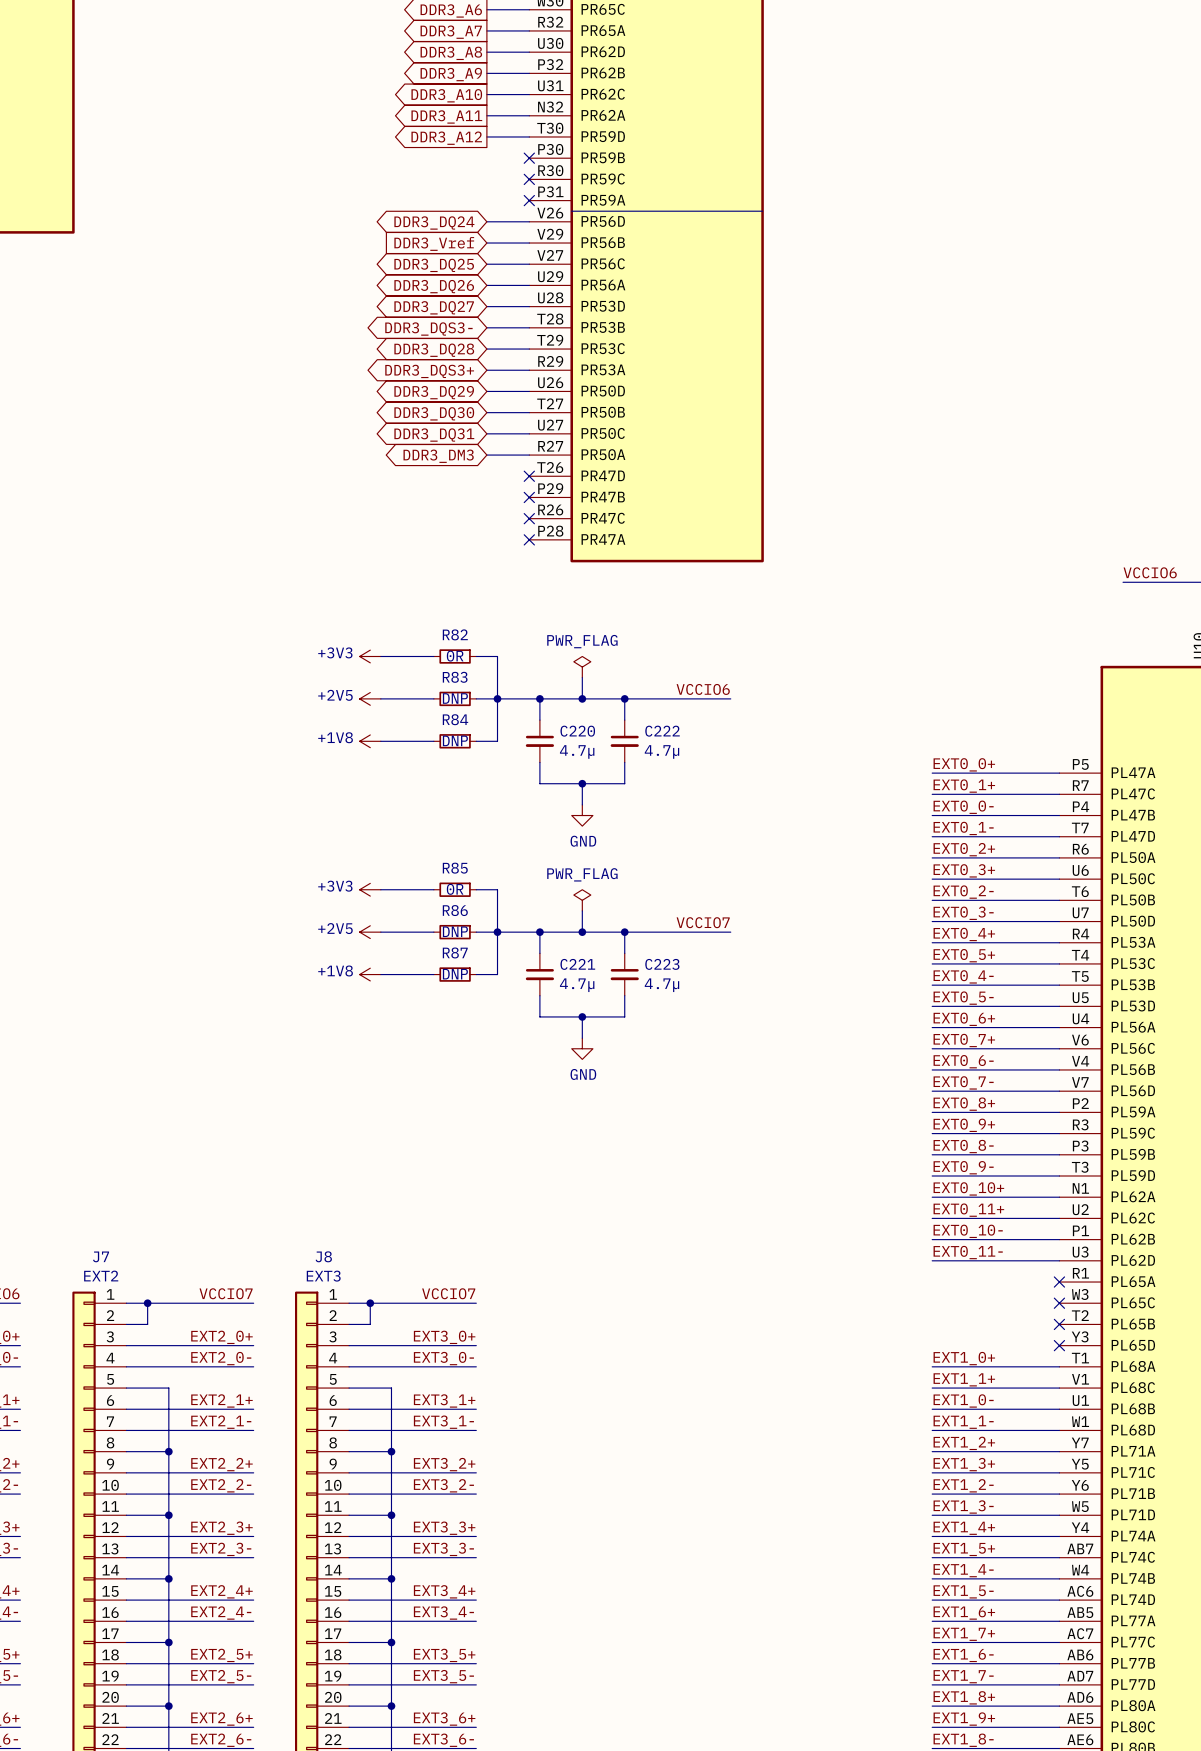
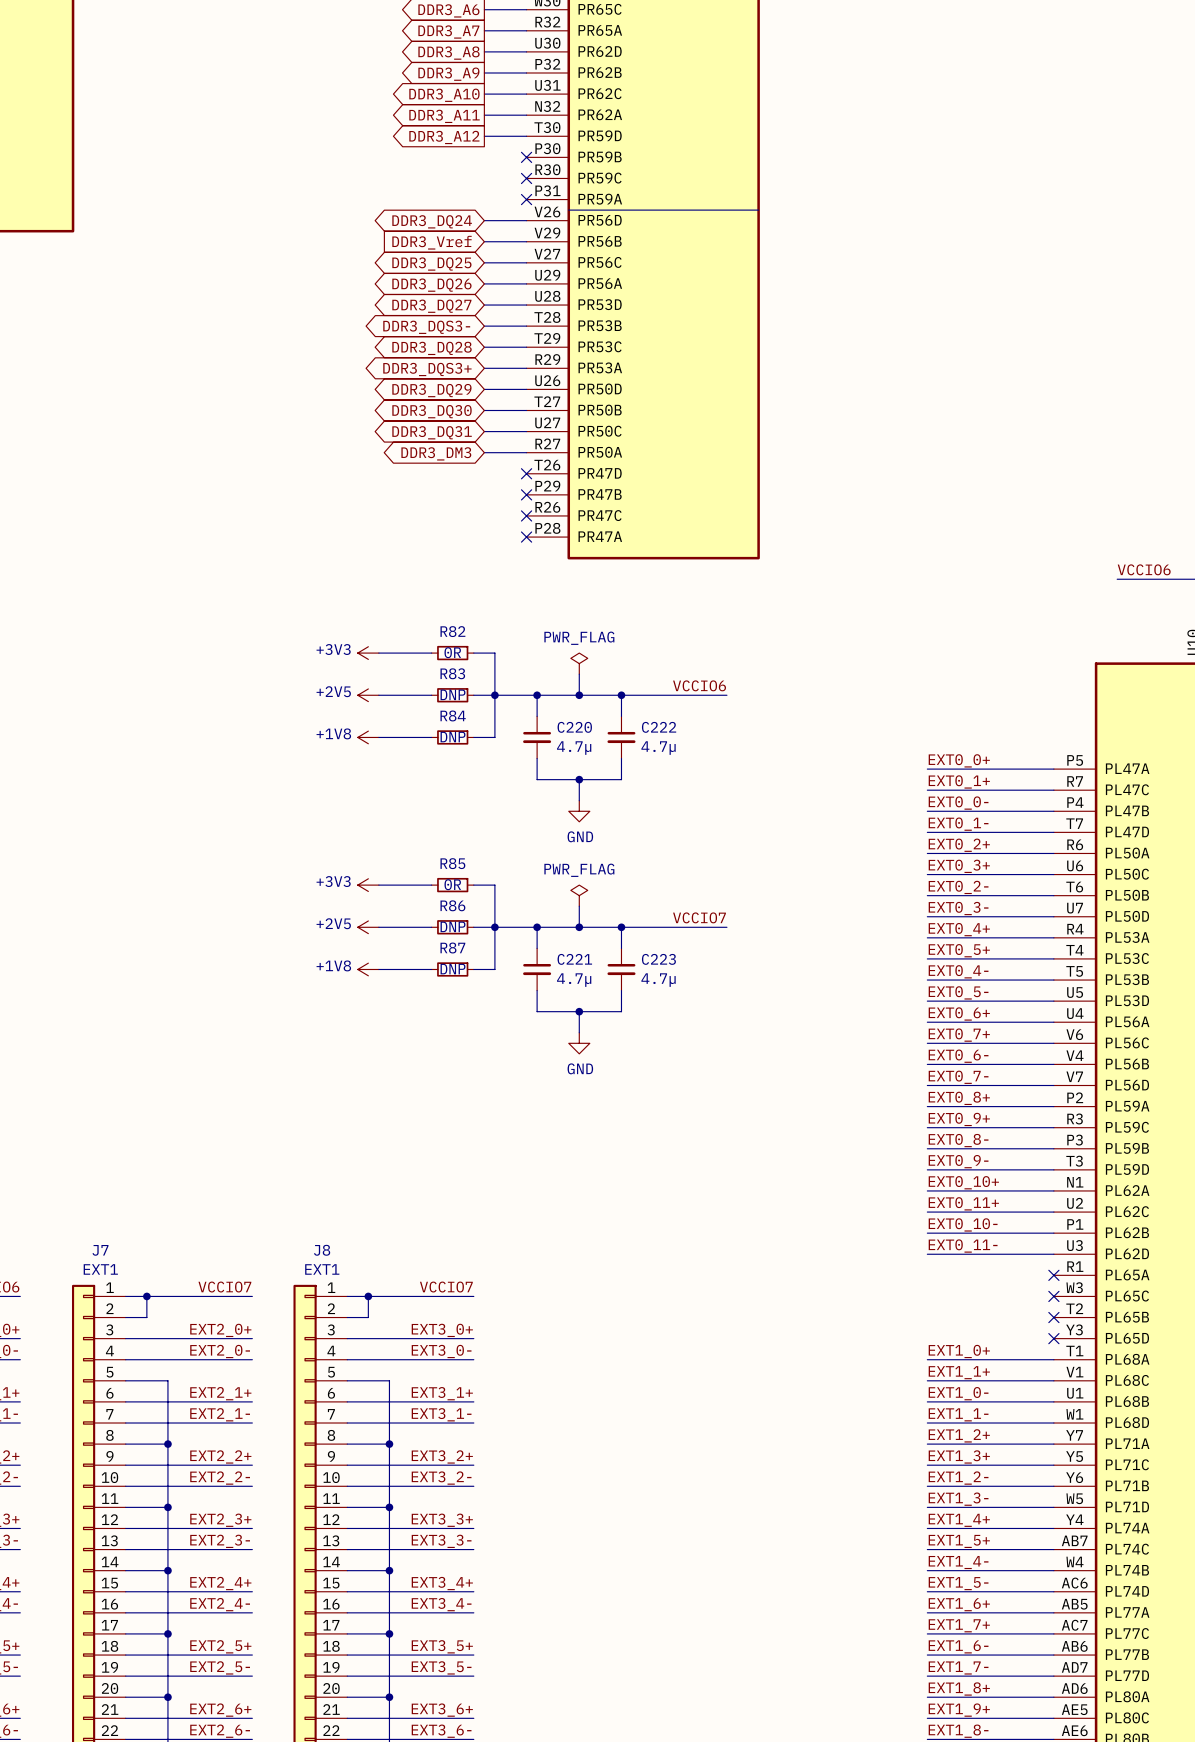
J7 value: EXT2 (101, 1276) -> EXT1 (100, 1269)
J8 value: EXT3 (323, 1276) -> EXT1 (322, 1269)

